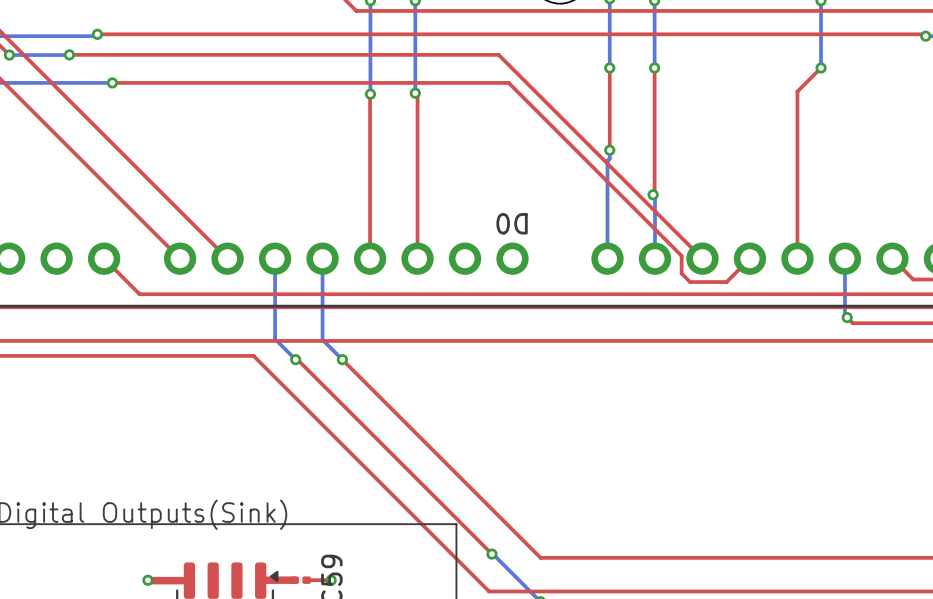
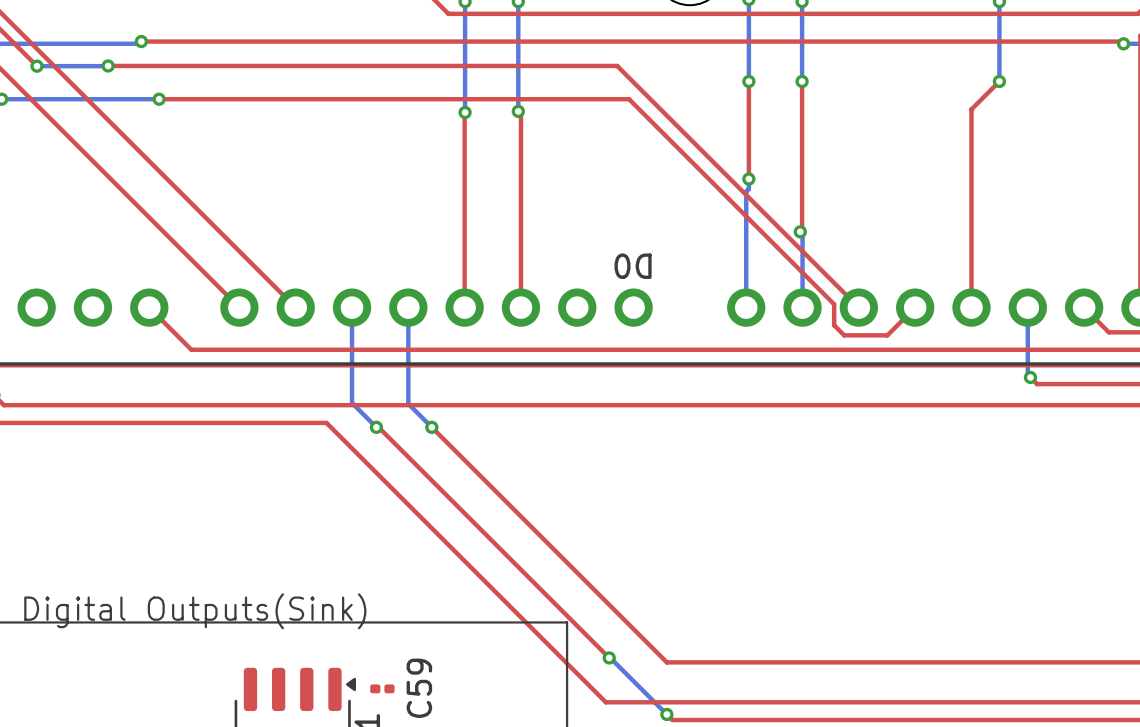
top track: (147, 580) (189, 580) -> none
via: (147, 580) -> none
top track: (294, 580) (260, 580) -> none
top track: (306, 580) (331, 580) -> none
via: (331, 580) -> none

